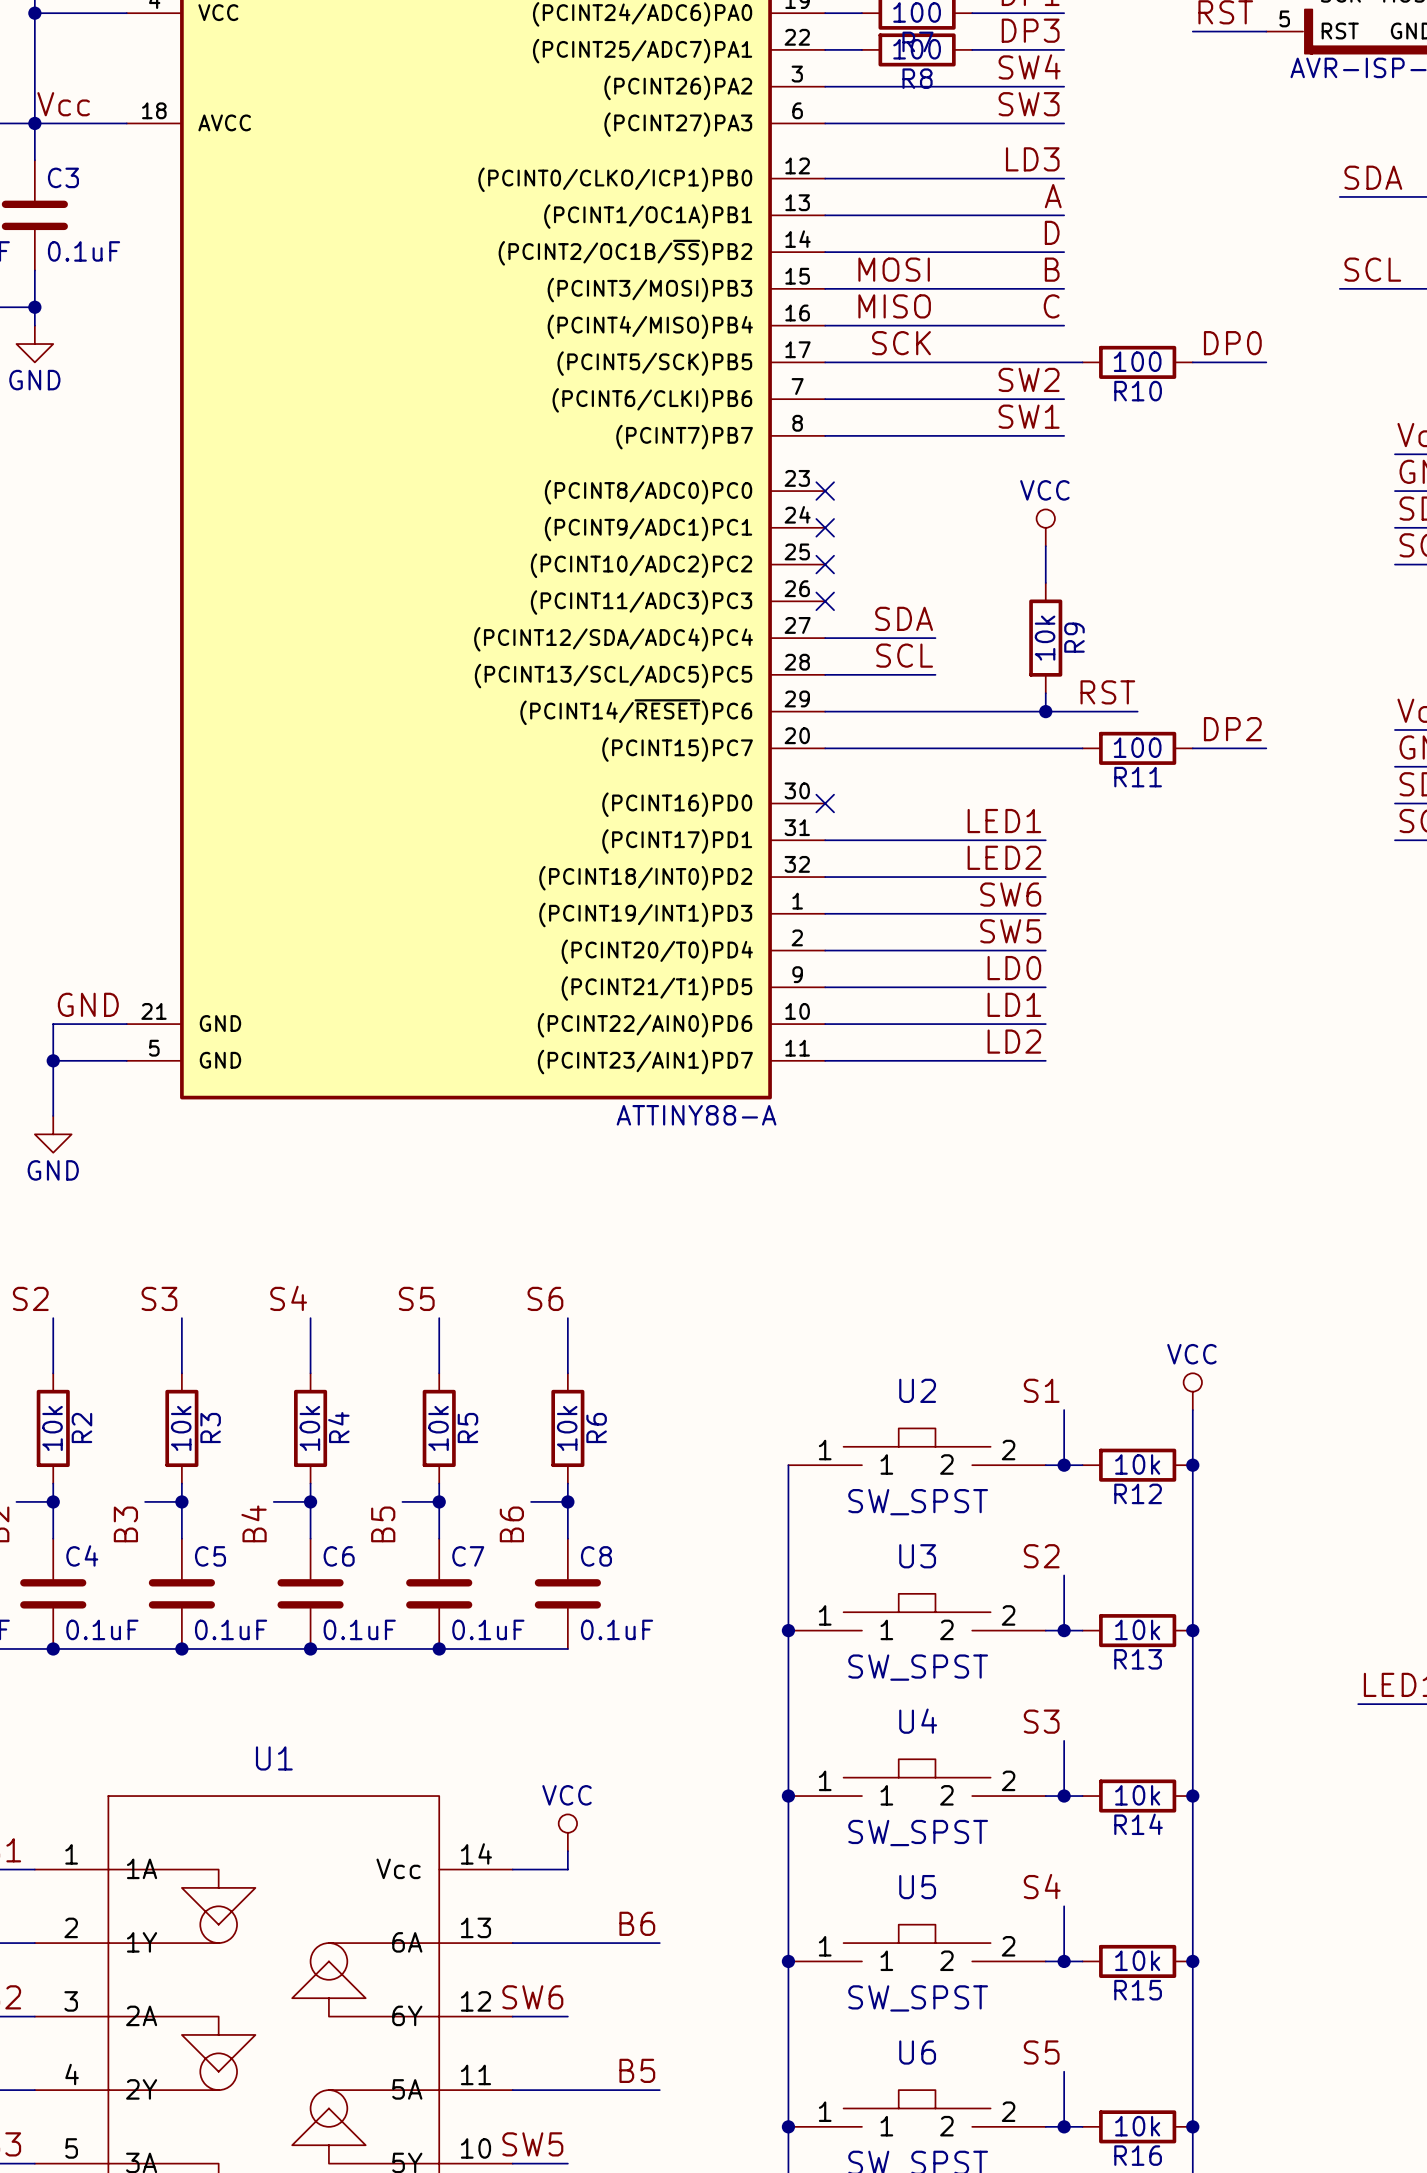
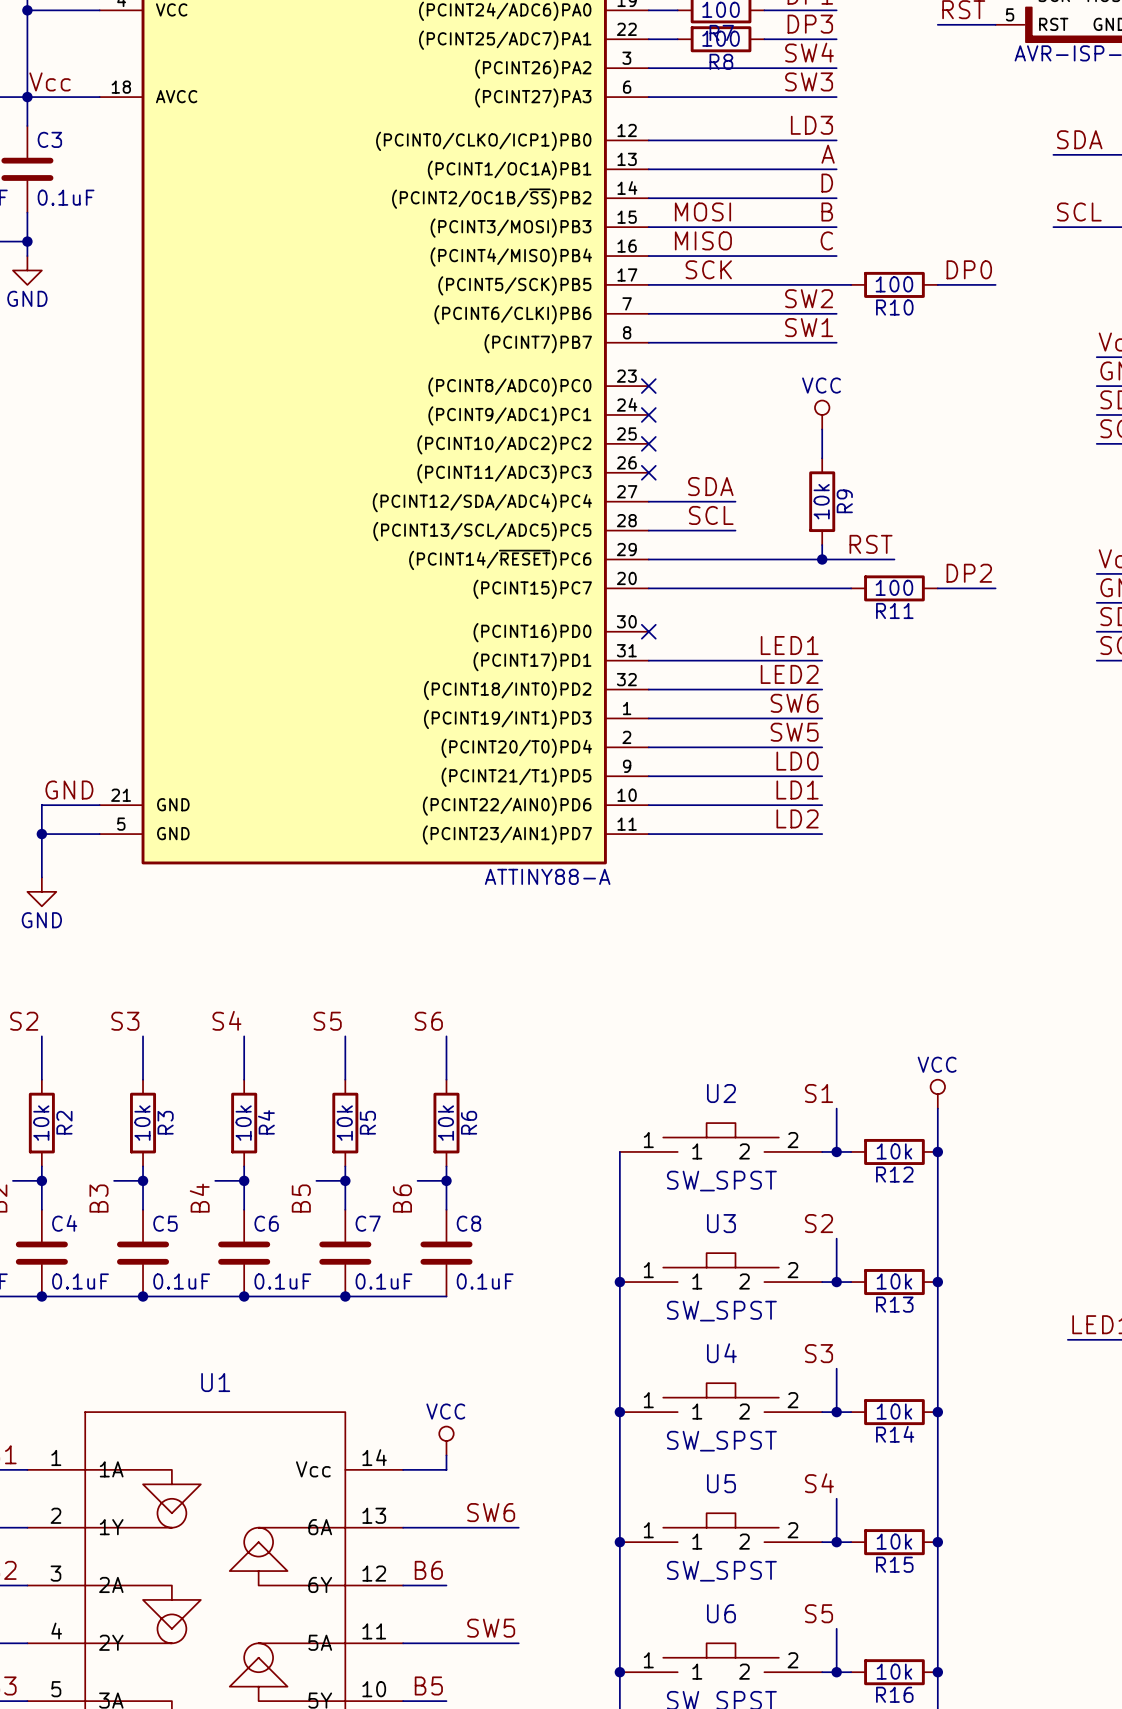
label: B6 (637, 1923) -> SW6 (491, 1512)
label: SW6 (532, 1997) -> B6 (428, 1570)
label: B5 (637, 2070) -> SW5 (491, 1628)
label: SW5 (532, 2144) -> B5 (428, 1685)

